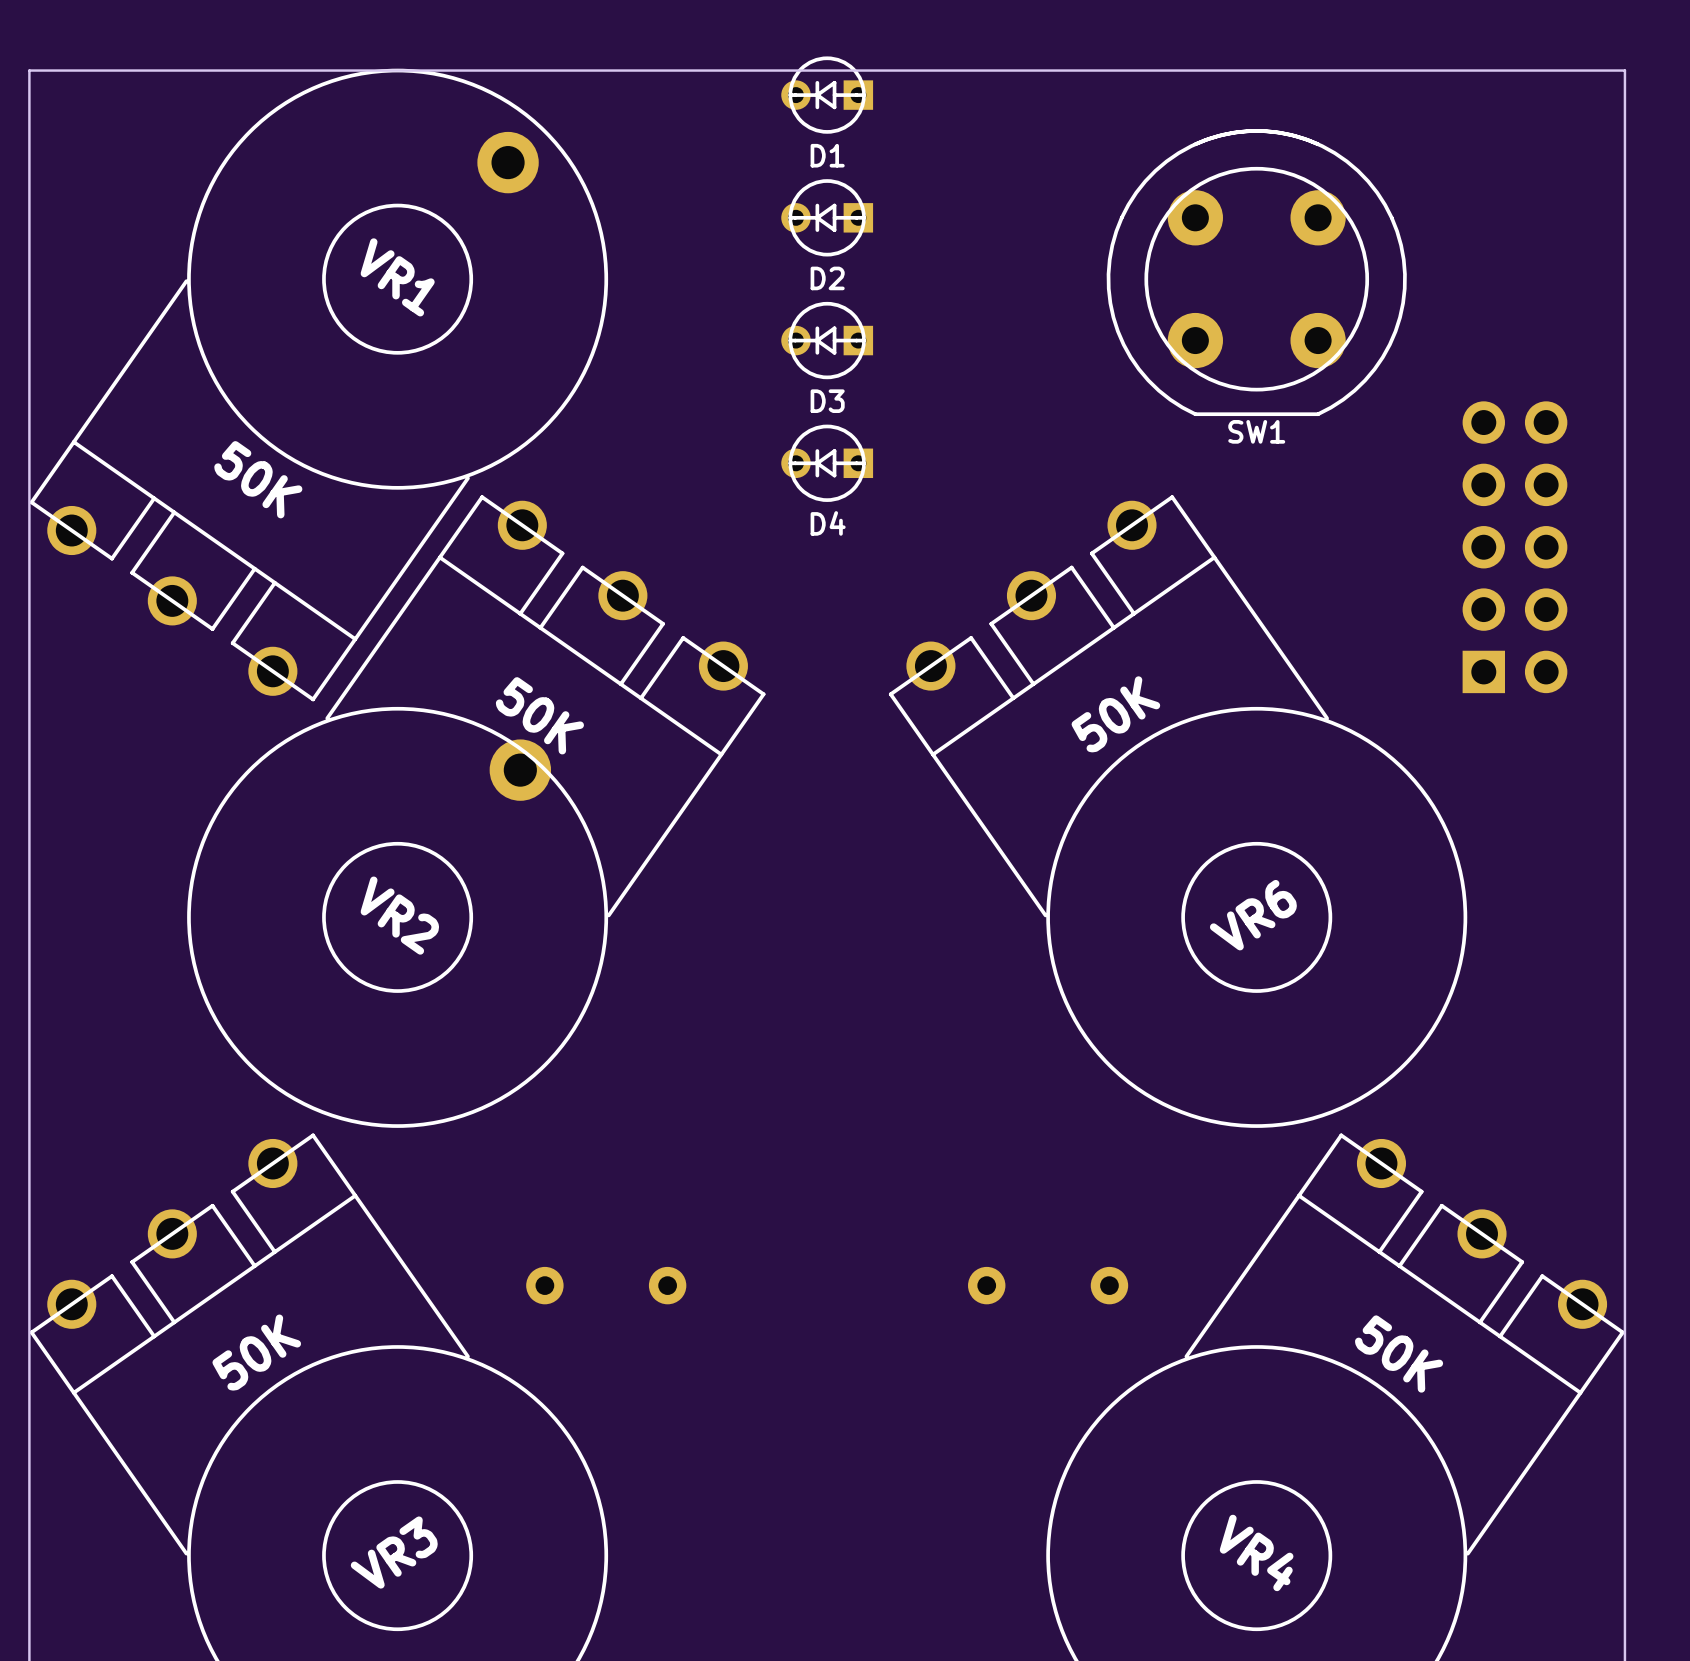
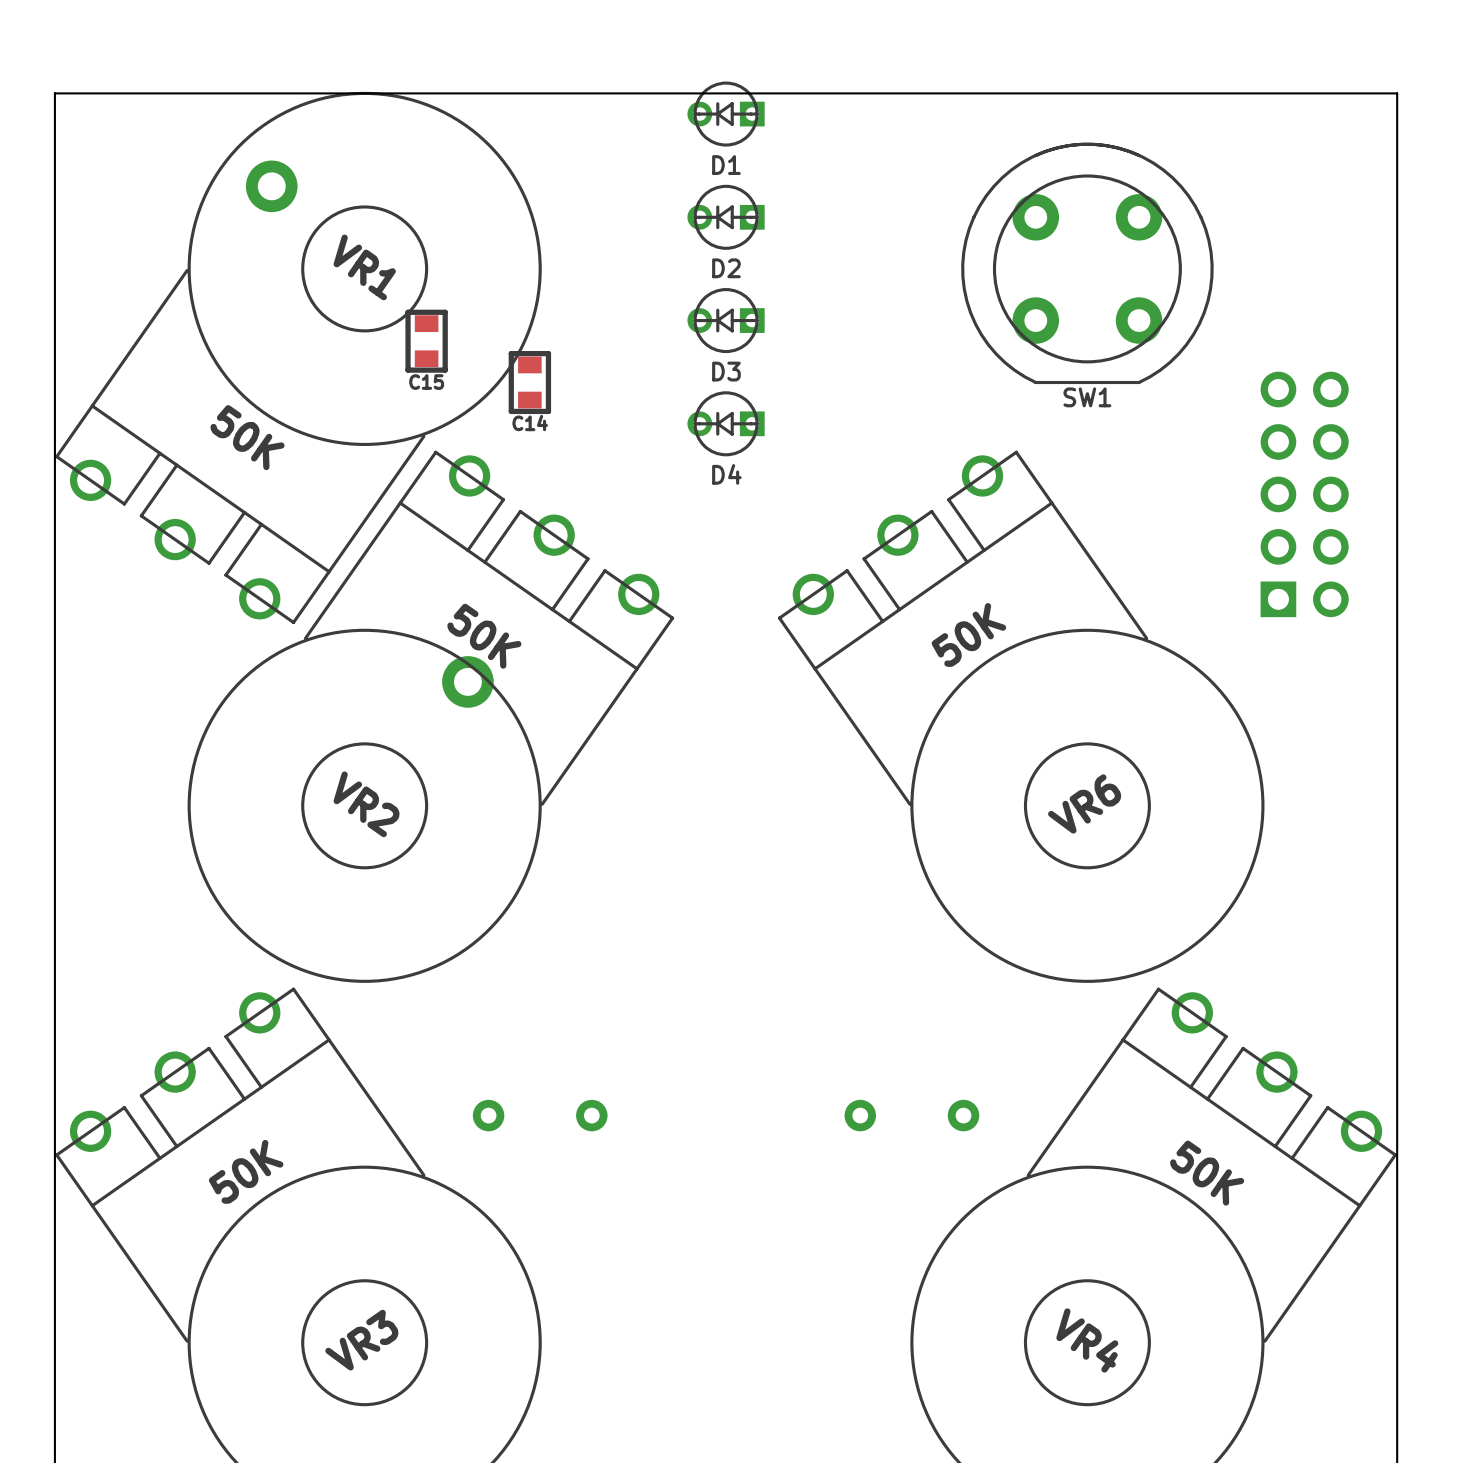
part position: (508, 162) -> (271, 186)
C15: none -> (426, 341)
C14: none -> (529, 382)

